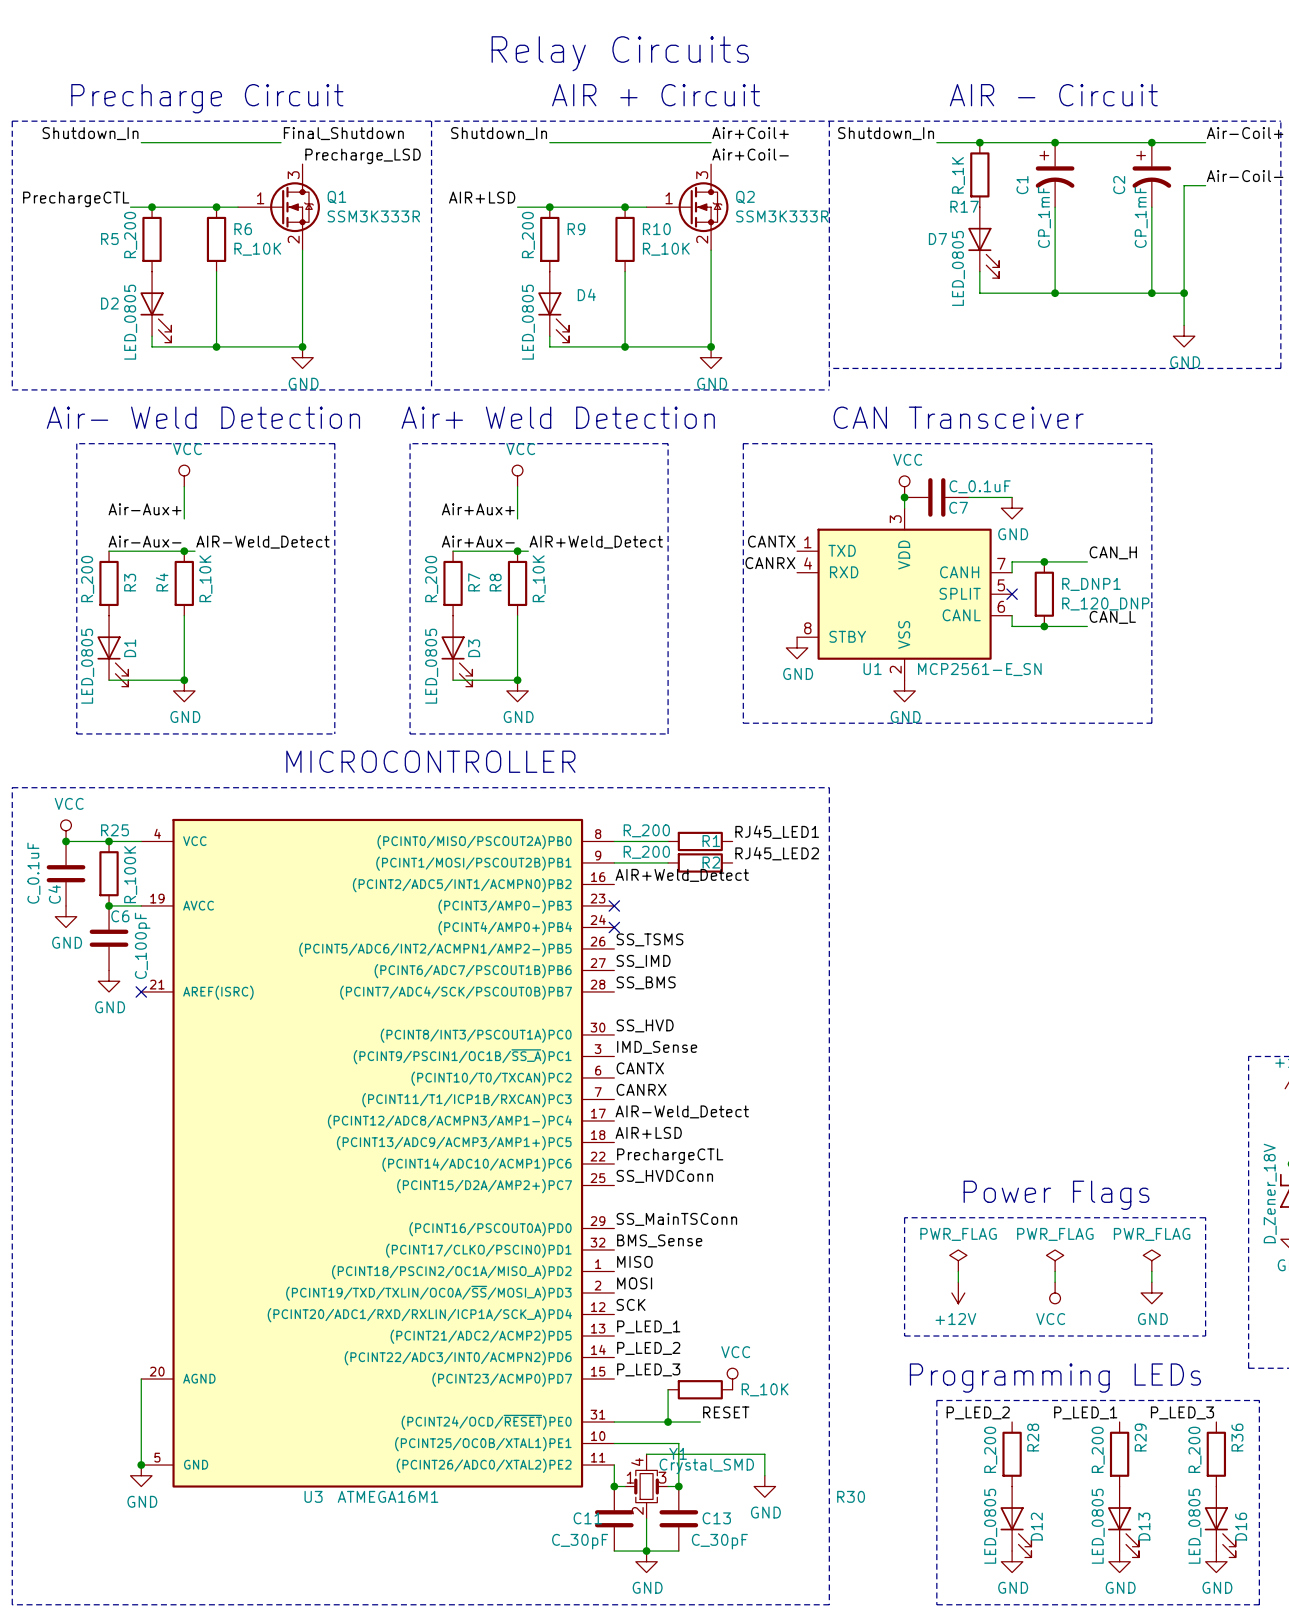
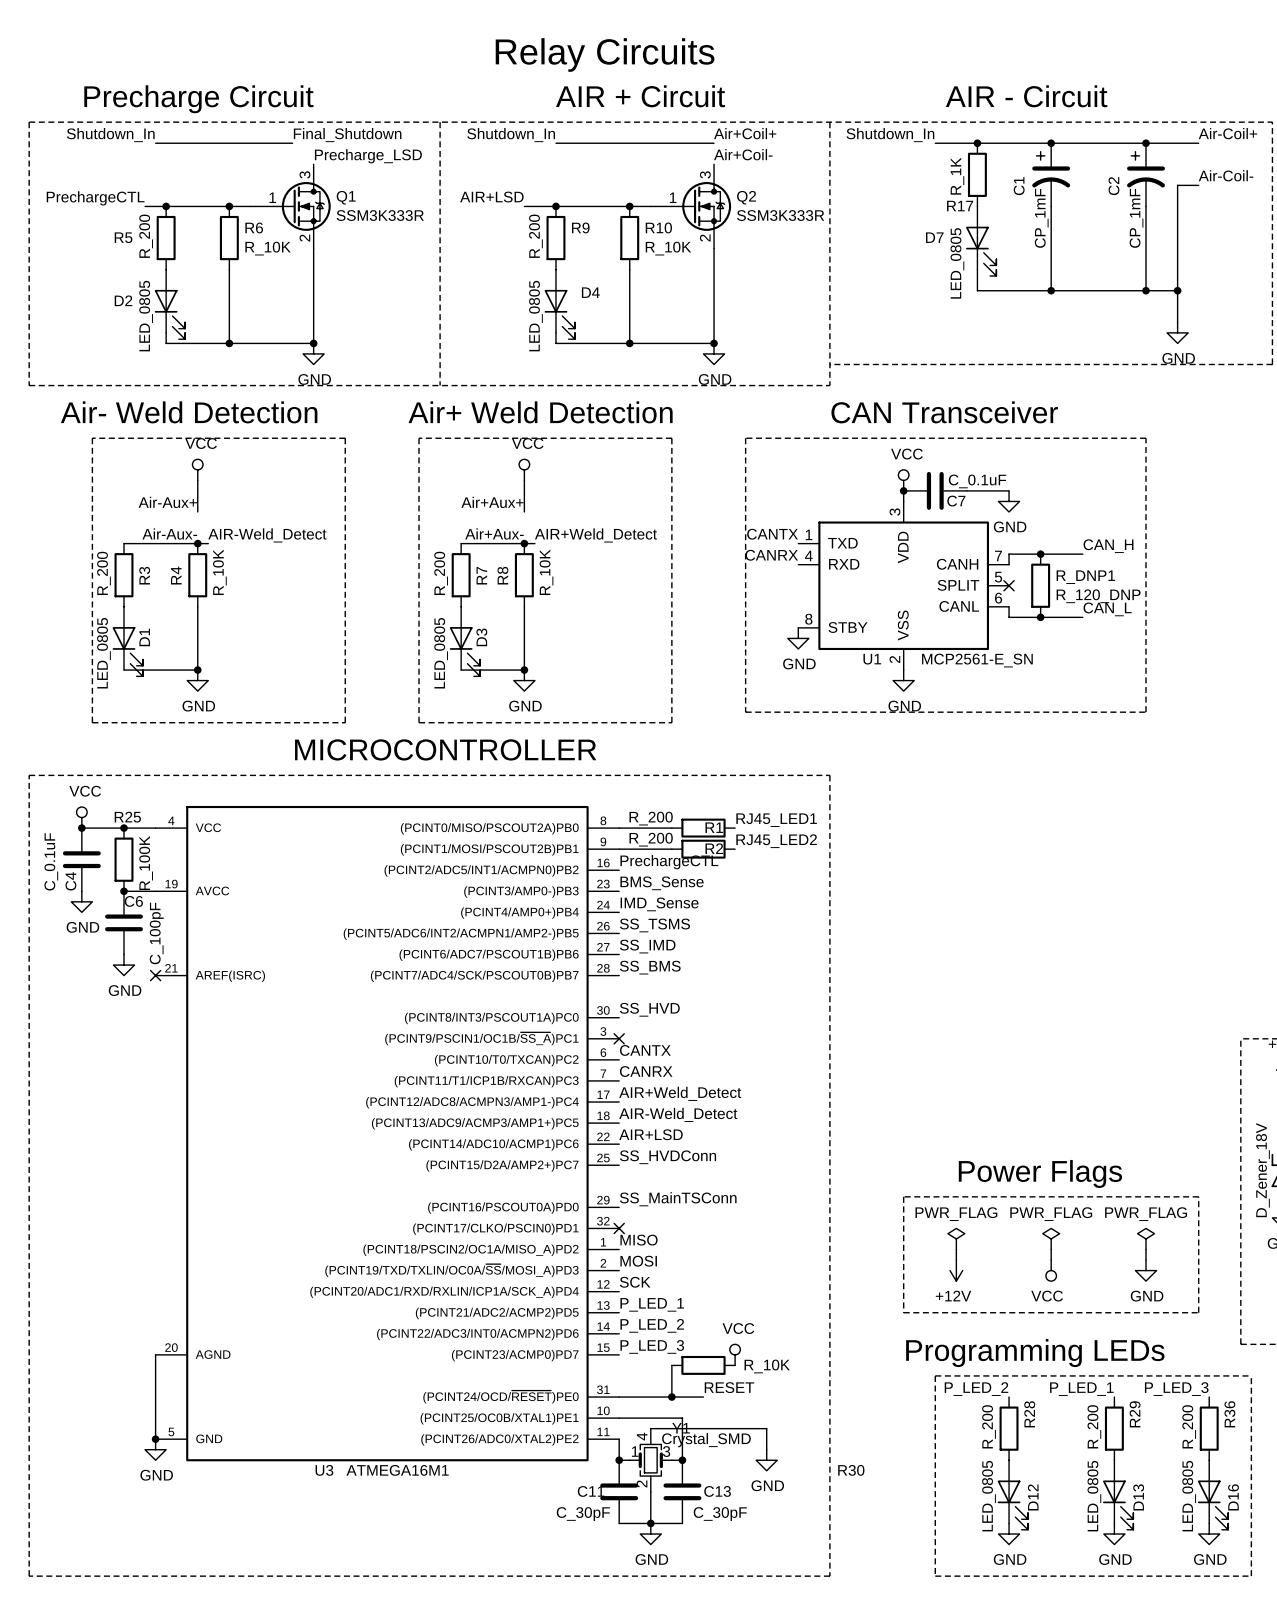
label: AIR+Weld_Detect (682, 875) -> PrechargeCTL (669, 862)
label: none -> BMS_Sense (662, 883)
no-connect mark: (614, 905) -> none
no-connect mark: (614, 927) -> none
label position: IMD_Sense (657, 1047) -> IMD_Sense (659, 904)
no-connect mark: none -> (619, 1038)
label: AIR-Weld_Detect (682, 1111) -> AIR+Weld_Detect (680, 1093)
label: AIR+LSD (648, 1132) -> AIR-Weld_Detect (678, 1114)
label: PrechargeCTL (670, 1156) -> AIR+LSD (650, 1134)
label: BMS_Sense (659, 1240) -> none
no-connect mark: none -> (619, 1228)

